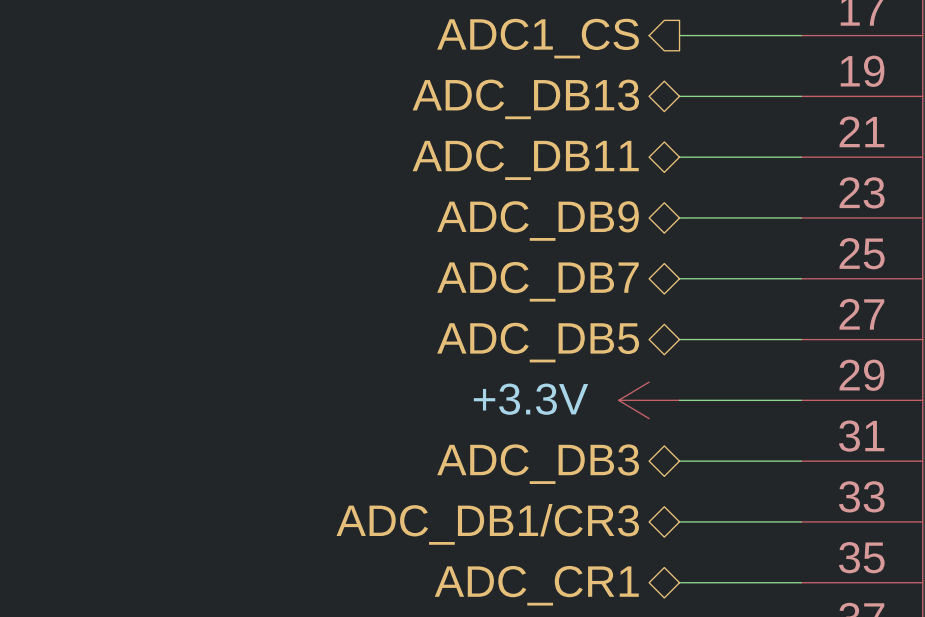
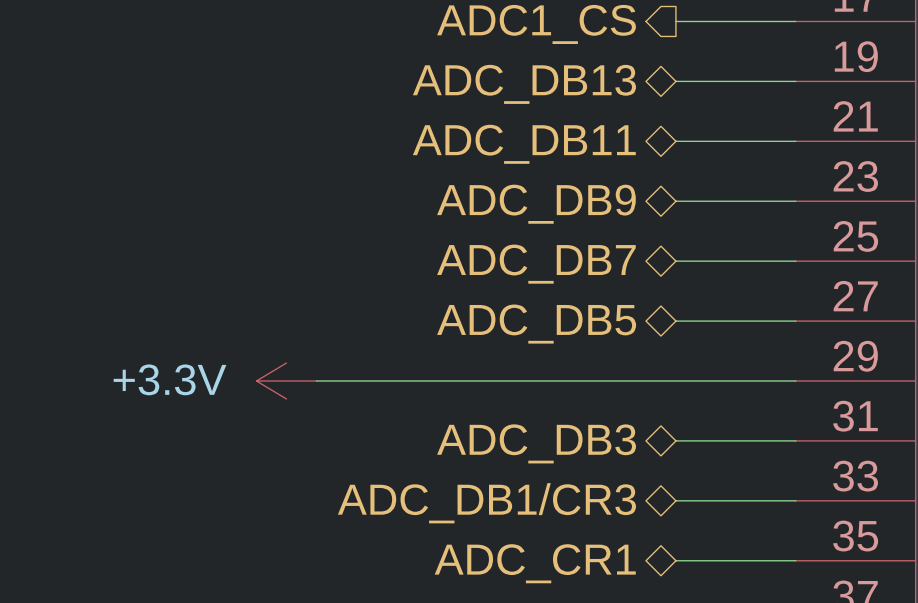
wire: none -> (316, 381) (675, 381)
power symbol position: +3.3V (649, 400) -> +3.3V (286, 381)

